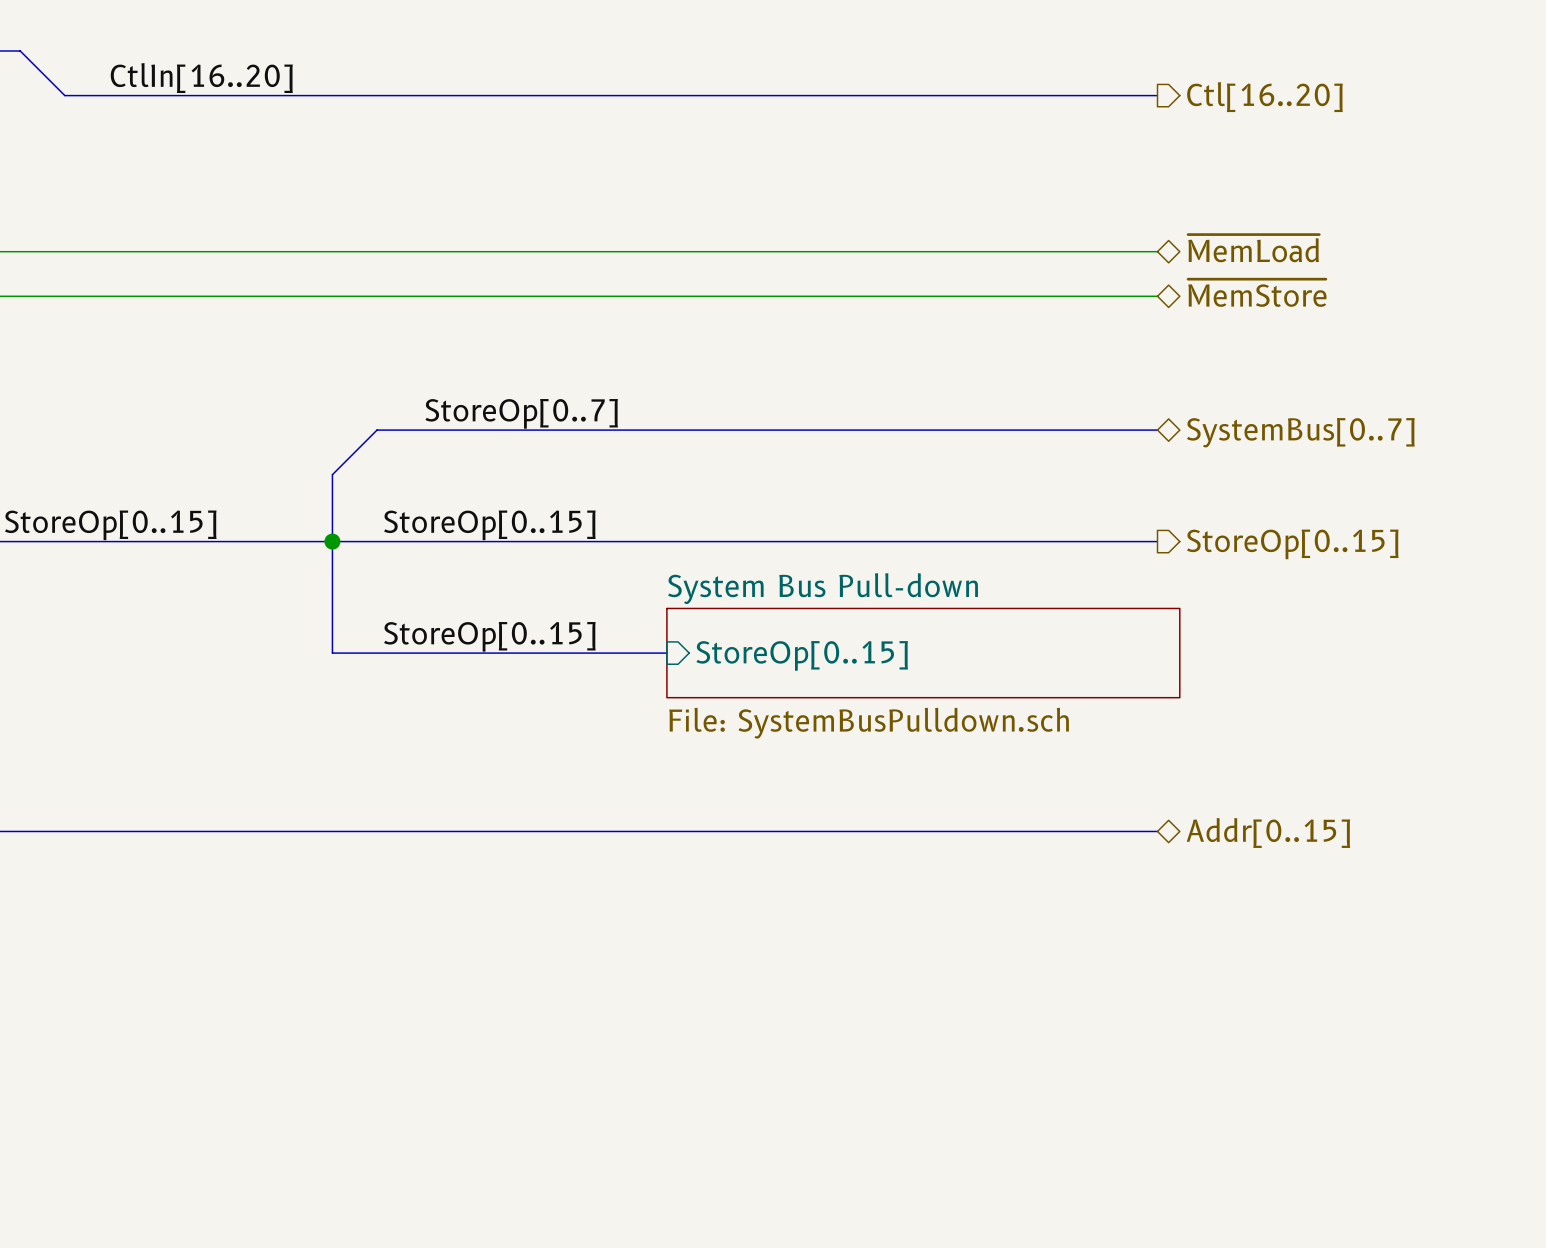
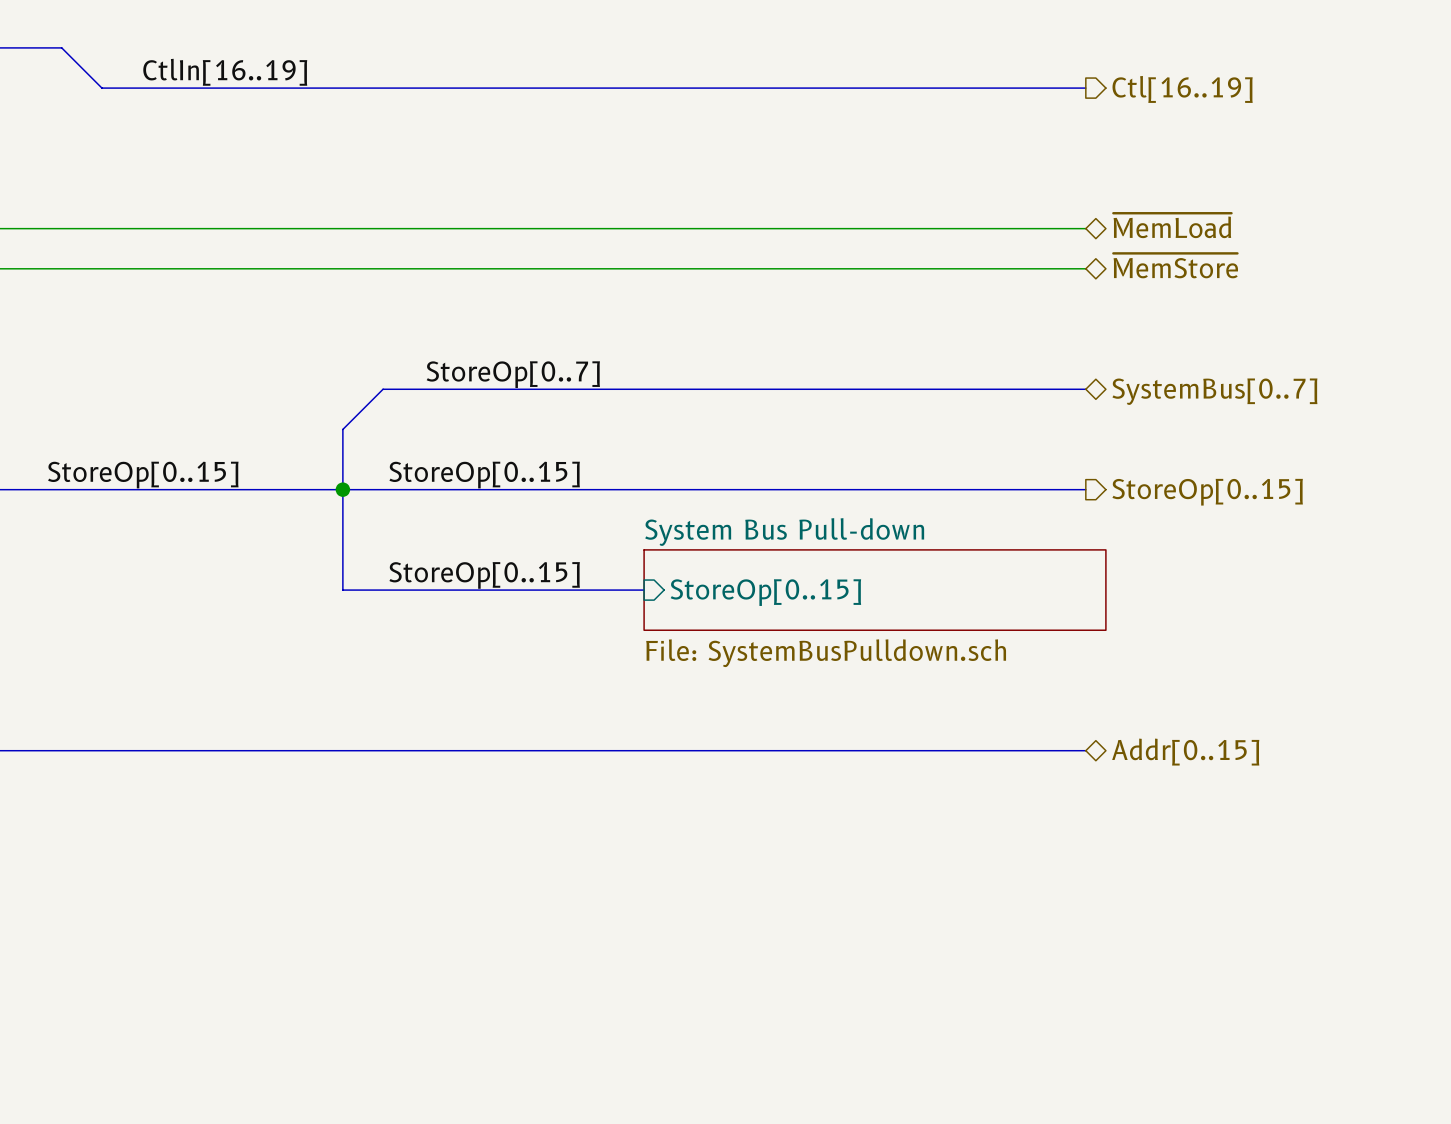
label: CtlIn[16..20] (201, 78) -> CtlIn[16..19] (225, 72)
hierarchical label: Ctl[16..20] (1264, 97) -> Ctl[16..19] (1182, 89)

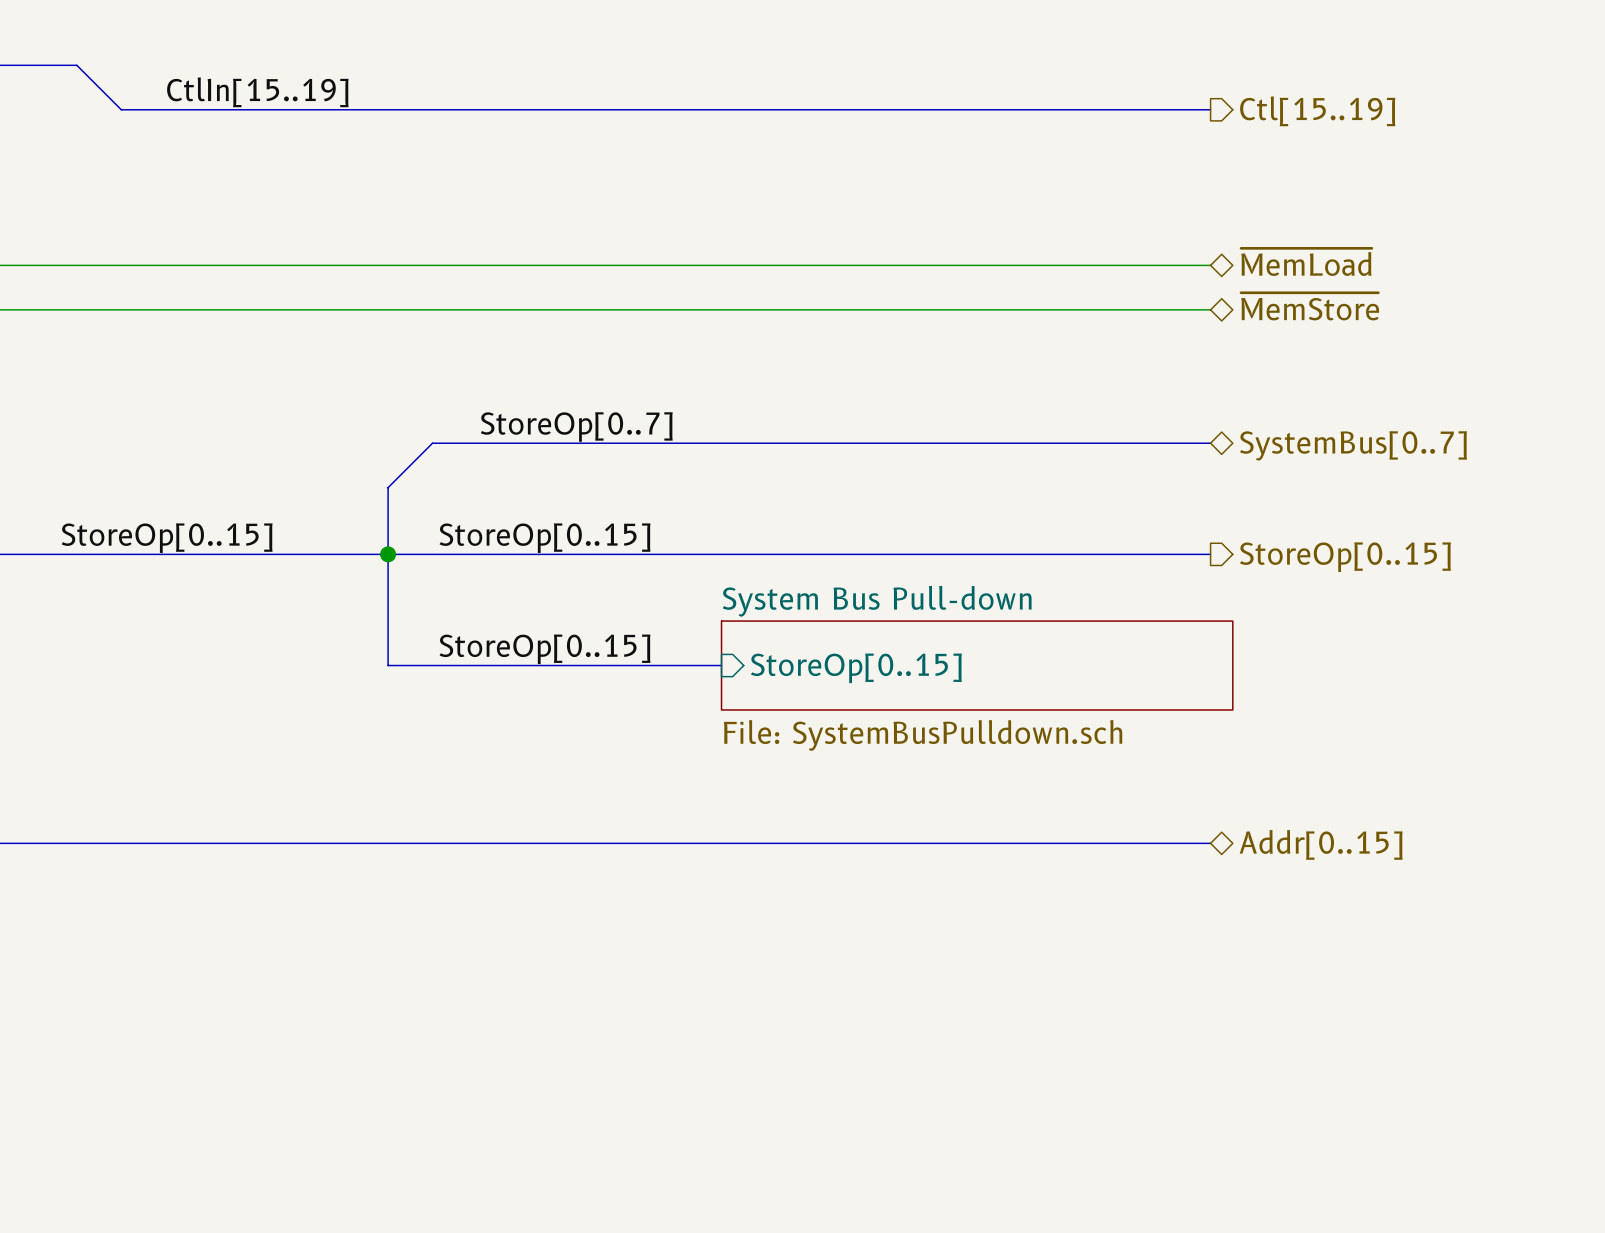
label: CtlIn[16..19] (225, 72) -> CtlIn[15..19] (257, 92)
hierarchical label: Ctl[16..19] (1182, 89) -> Ctl[15..19] (1317, 111)

